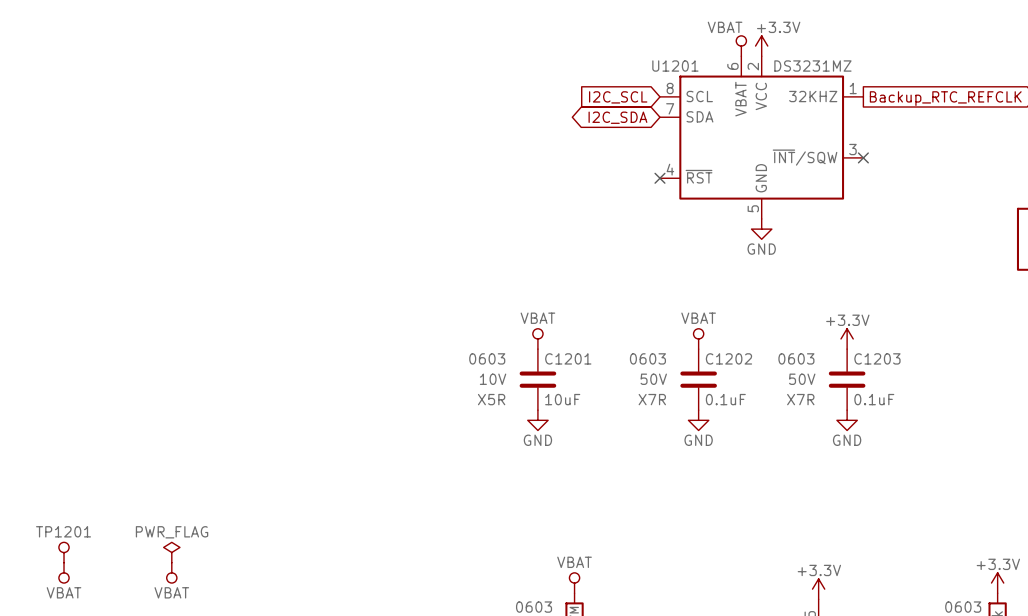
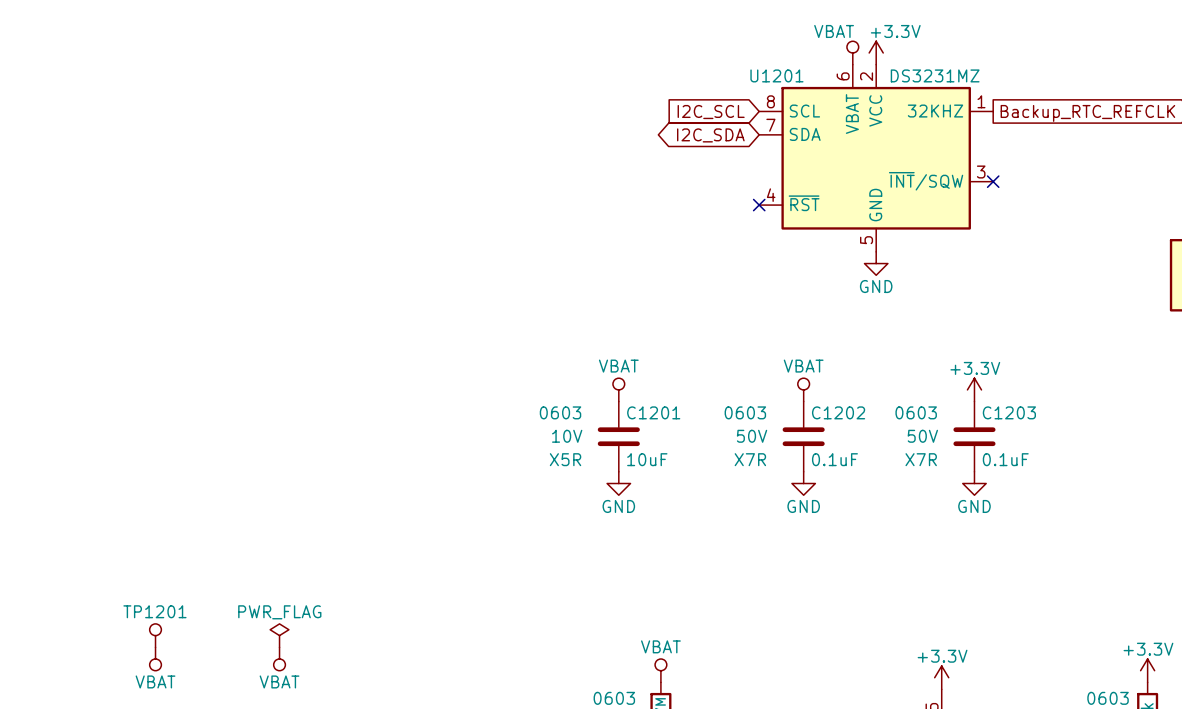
TP1201 position: (64, 552) -> (155, 635)
power symbol position: PWR_FLAG (171, 552) -> PWR_FLAG (279, 635)
power symbol: VBAT (64, 572) -> none
power symbol: none -> VBAT (155, 659)
power symbol: VBAT (171, 572) -> none
power symbol: none -> VBAT (279, 659)

